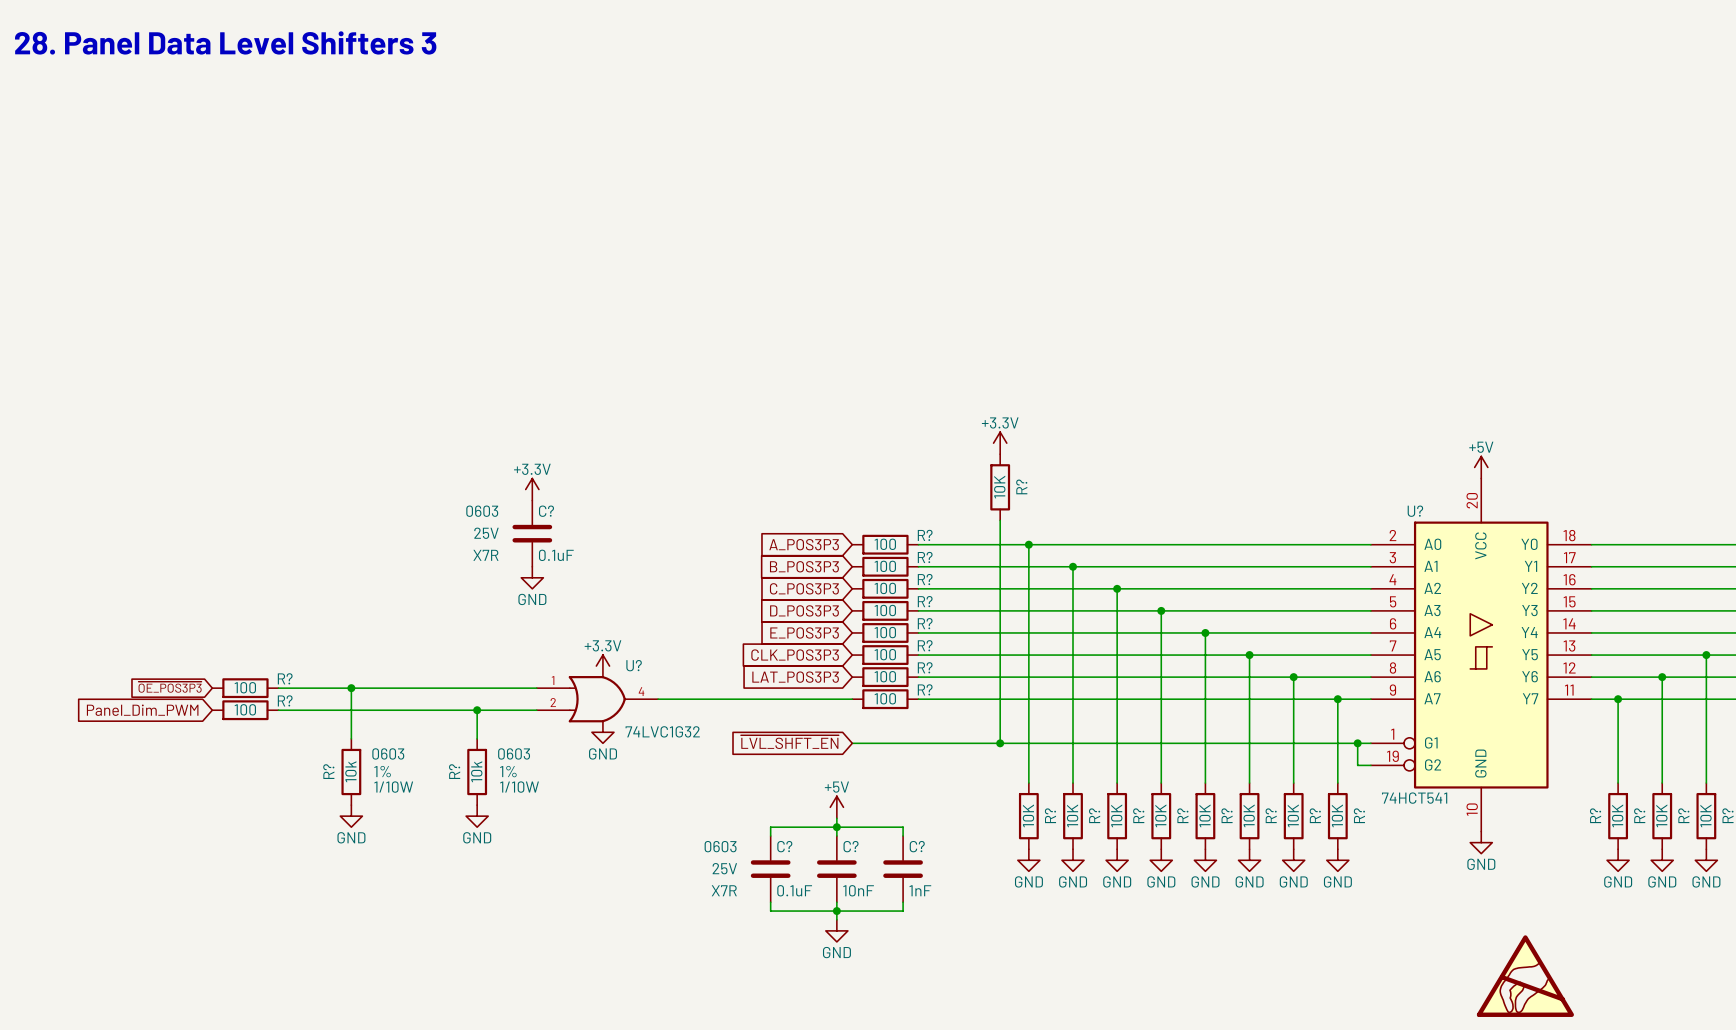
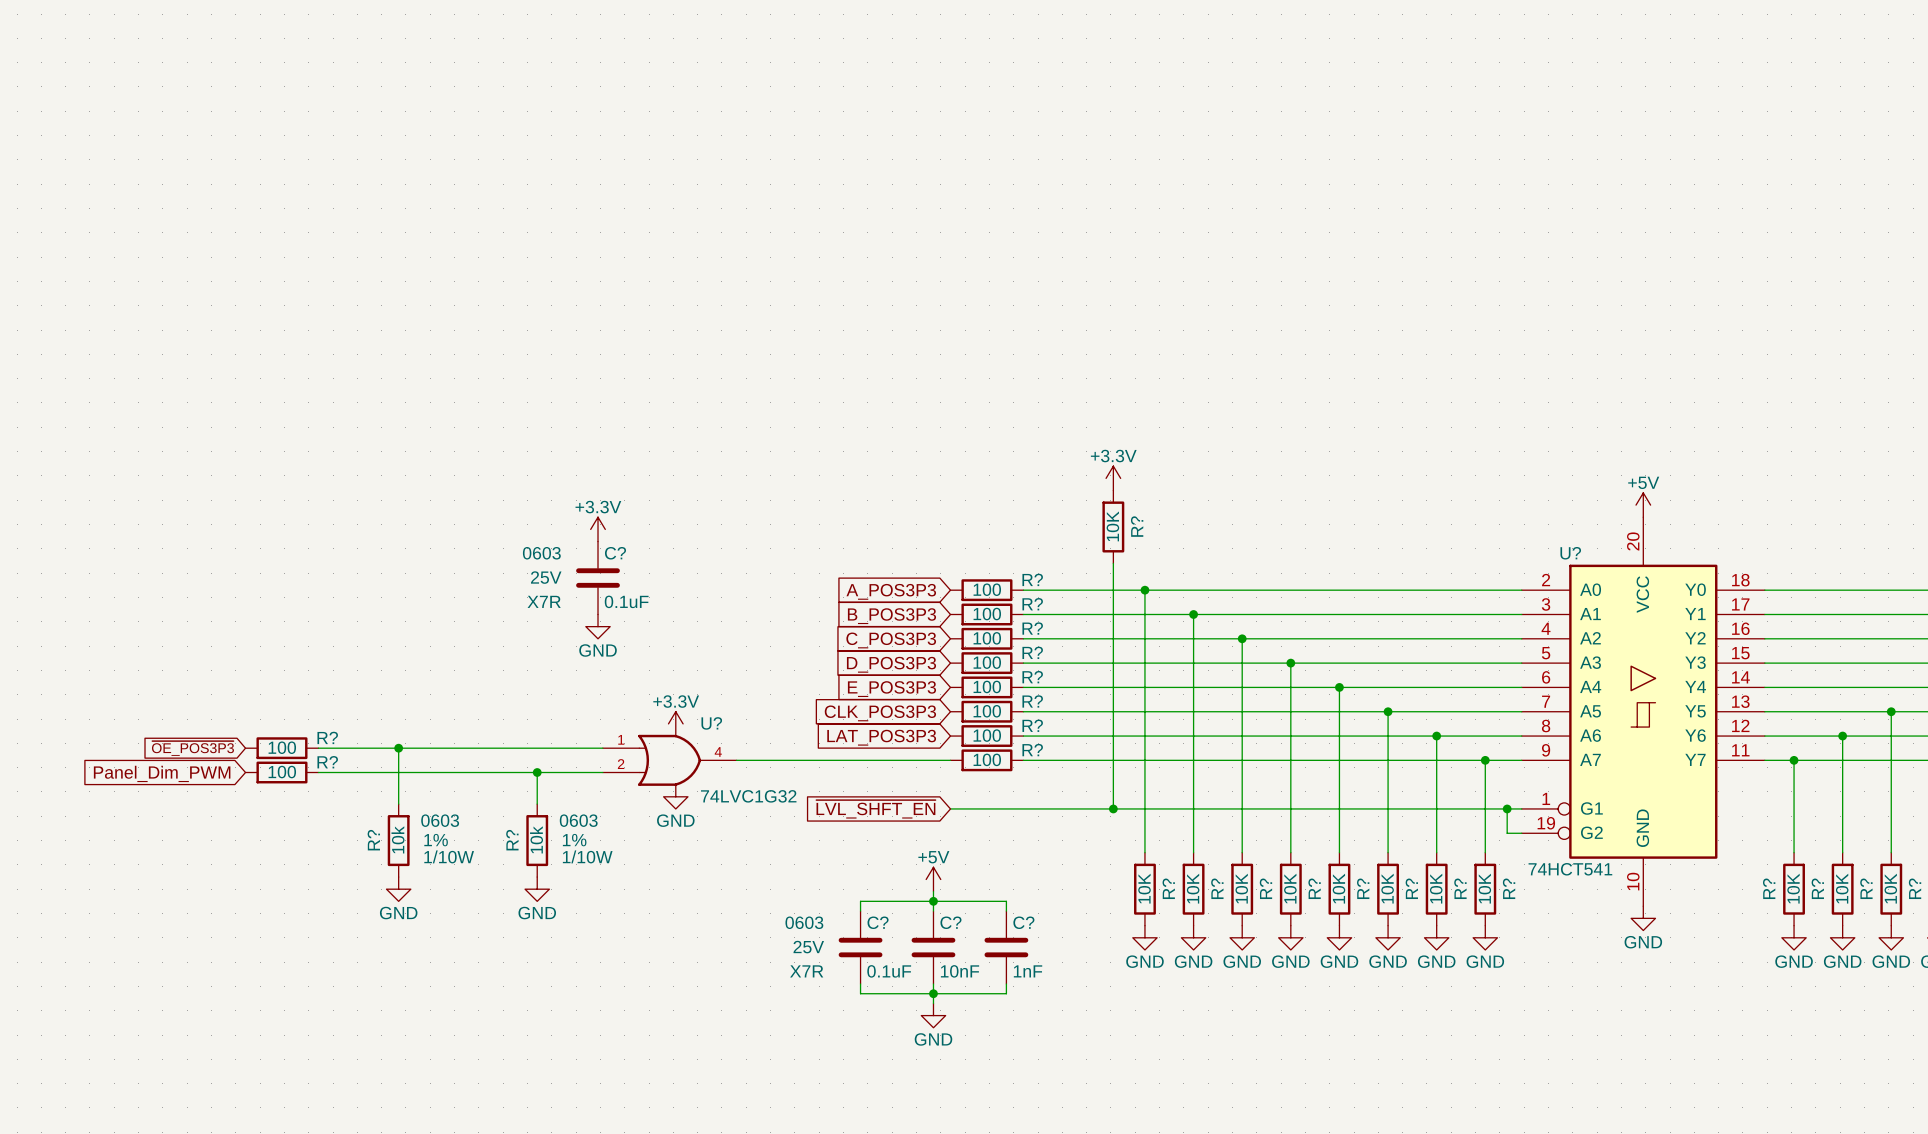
text: 28. Panel Data Level Shifters 3 (225, 42) -> none
power symbol: (1525, 976) -> none

